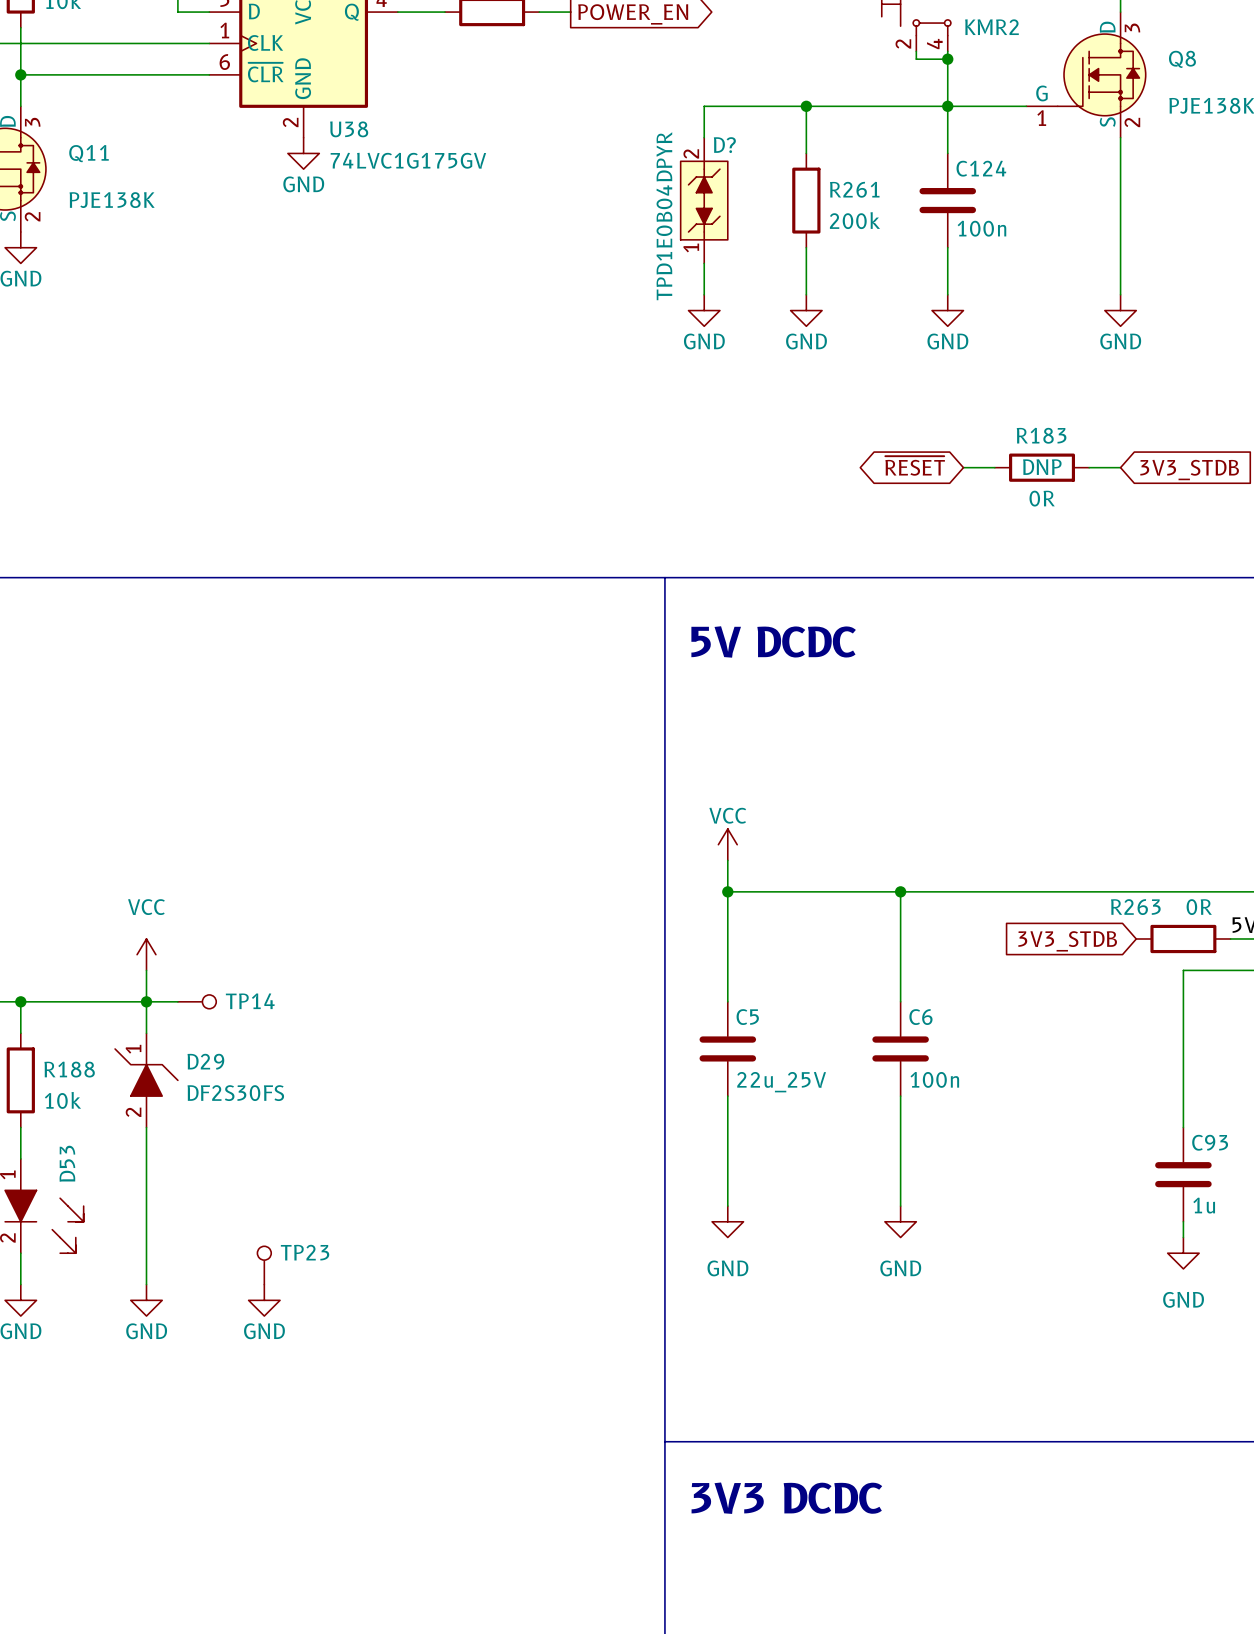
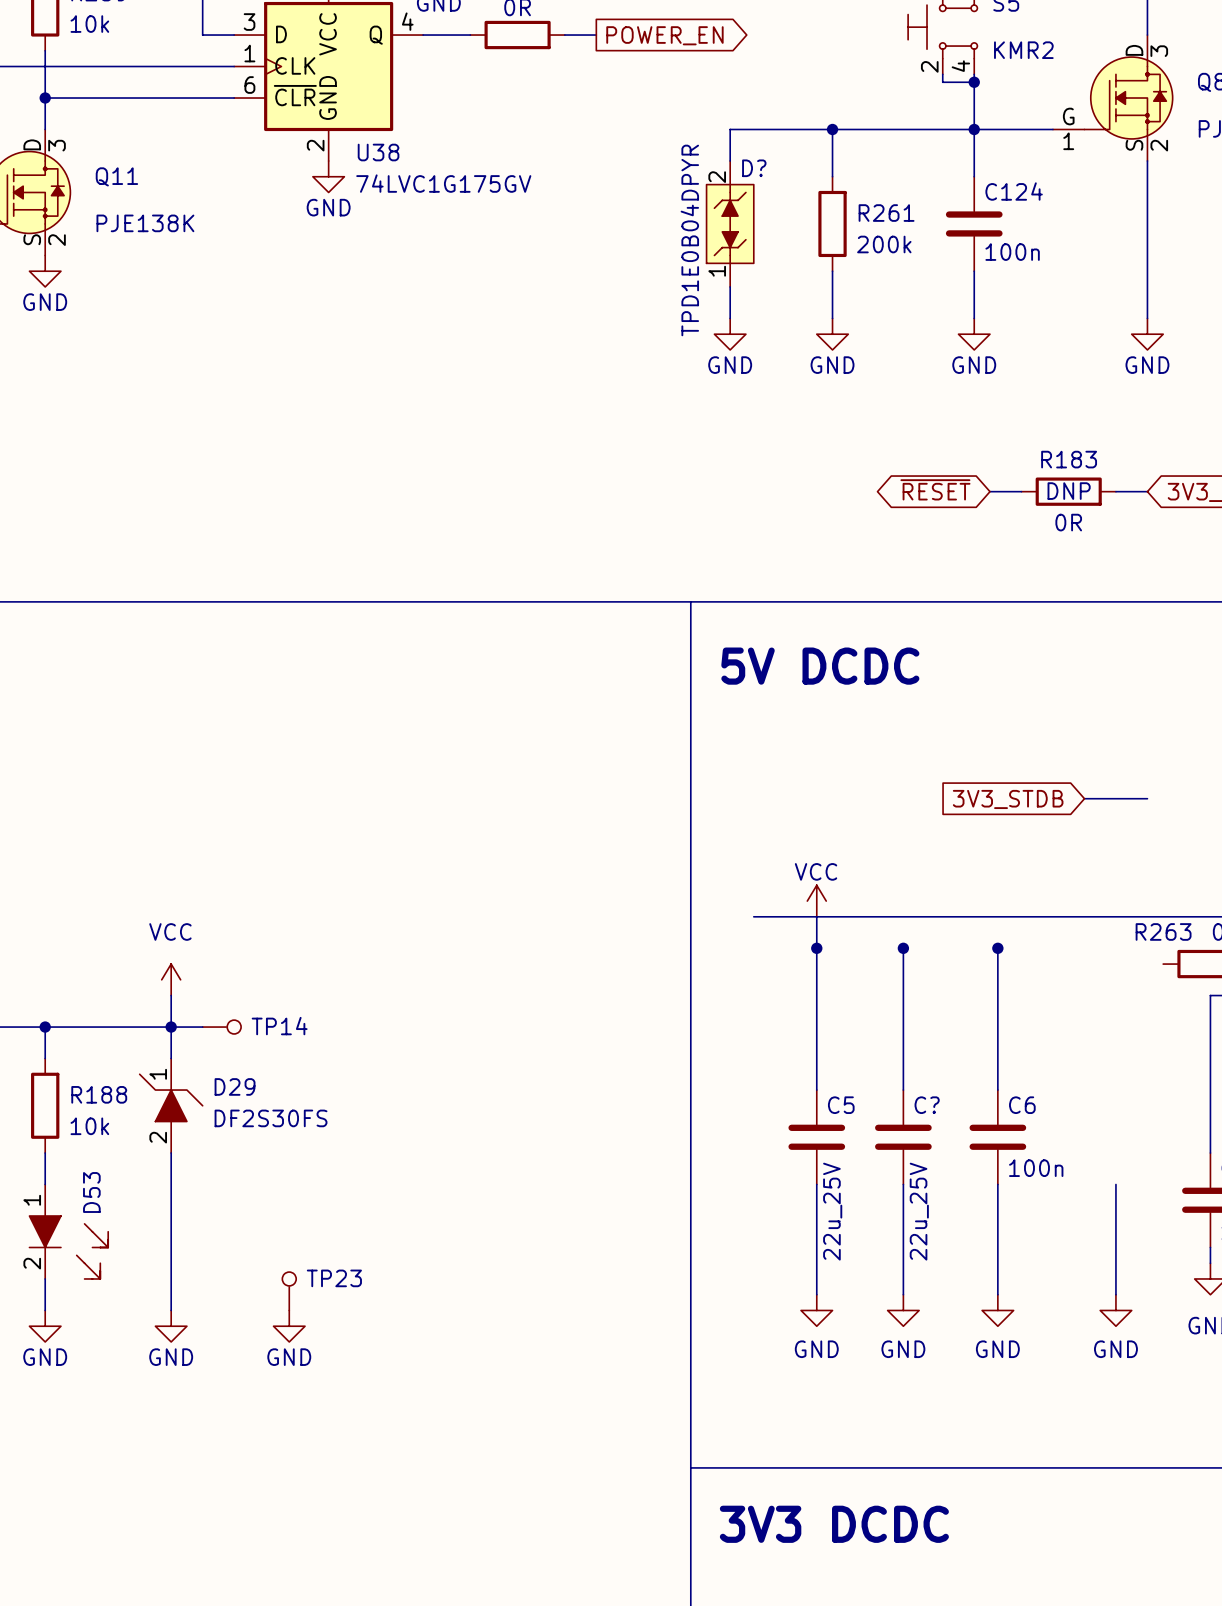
wire: none -> (1084, 798) (1147, 798)
power symbol position: VCC (727, 844) -> VCC (816, 901)
wire: (727, 860) (727, 1001) -> (903, 948) (903, 1090)
junction: (727, 891) -> none
wire: none -> (816, 916) (816, 1090)
wire: (900, 891) (900, 1001) -> (816, 1184) (816, 1294)
junction: (900, 891) -> none
junction: none -> (816, 948)
junction: none -> (903, 948)
wire: none -> (997, 948) (997, 1090)
junction: none -> (997, 948)
global label position: 3V3_STDB (1067, 941) -> 3V3_STDB (1008, 799)
C5 position: (727, 1048) -> (816, 1137)
C6 position: (900, 1048) -> (997, 1137)
C5 text rotation: 0° (781, 1082) -> 90° counterclockwise (832, 1211)
wire: (727, 1096) (727, 1206) -> (903, 1184) (903, 1294)
wire: (900, 1096) (900, 1206) -> (997, 1184) (997, 1294)
C?: none -> (903, 1137)
wire: none -> (1115, 1184) (1115, 1294)
power symbol: GND (727, 1221) -> none
power symbol: GND (900, 1221) -> none
power symbol: none -> GND (816, 1310)
power symbol: none -> GND (903, 1310)
power symbol: none -> GND (997, 1310)
power symbol: none -> GND (1115, 1310)

